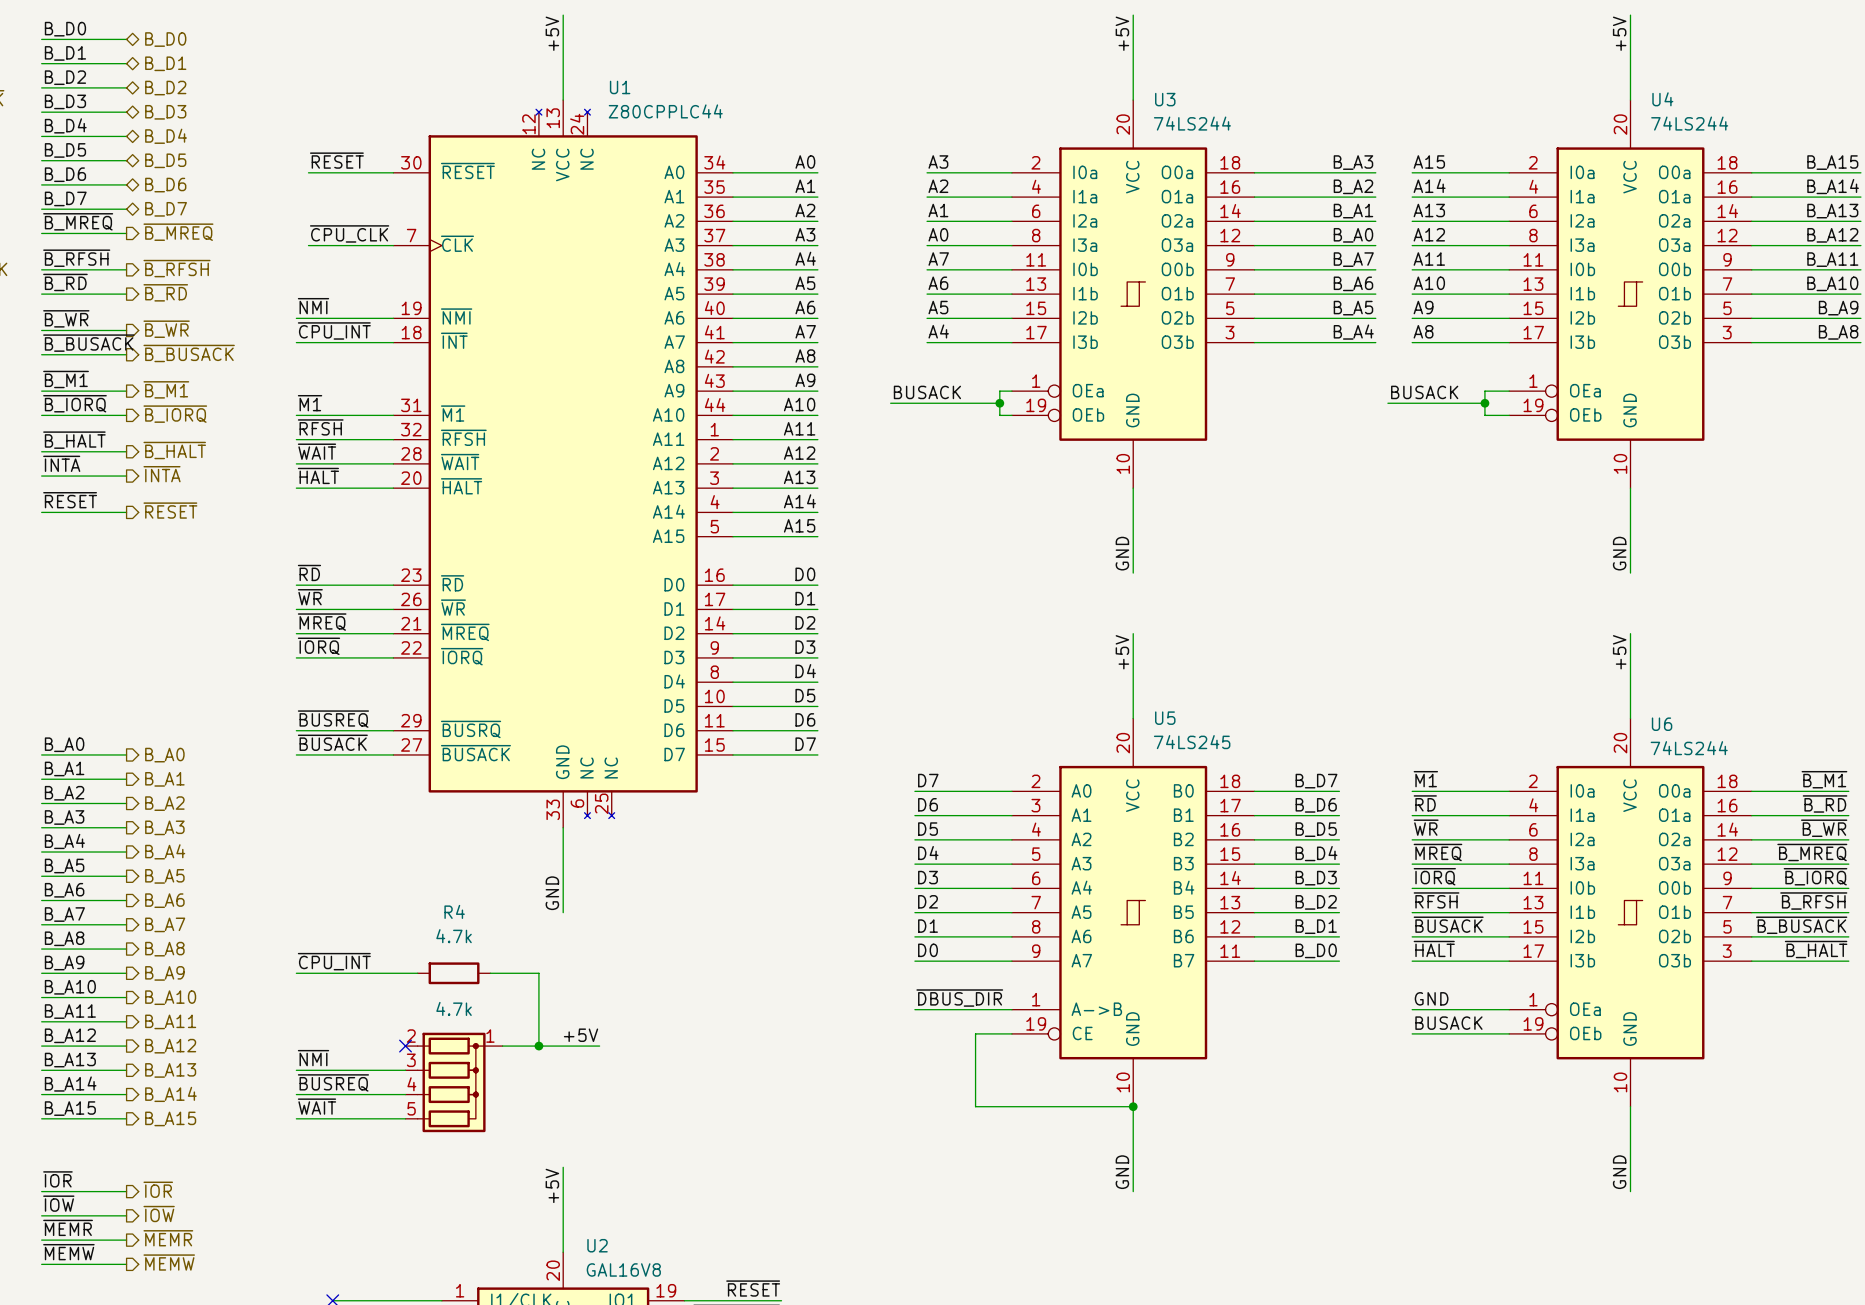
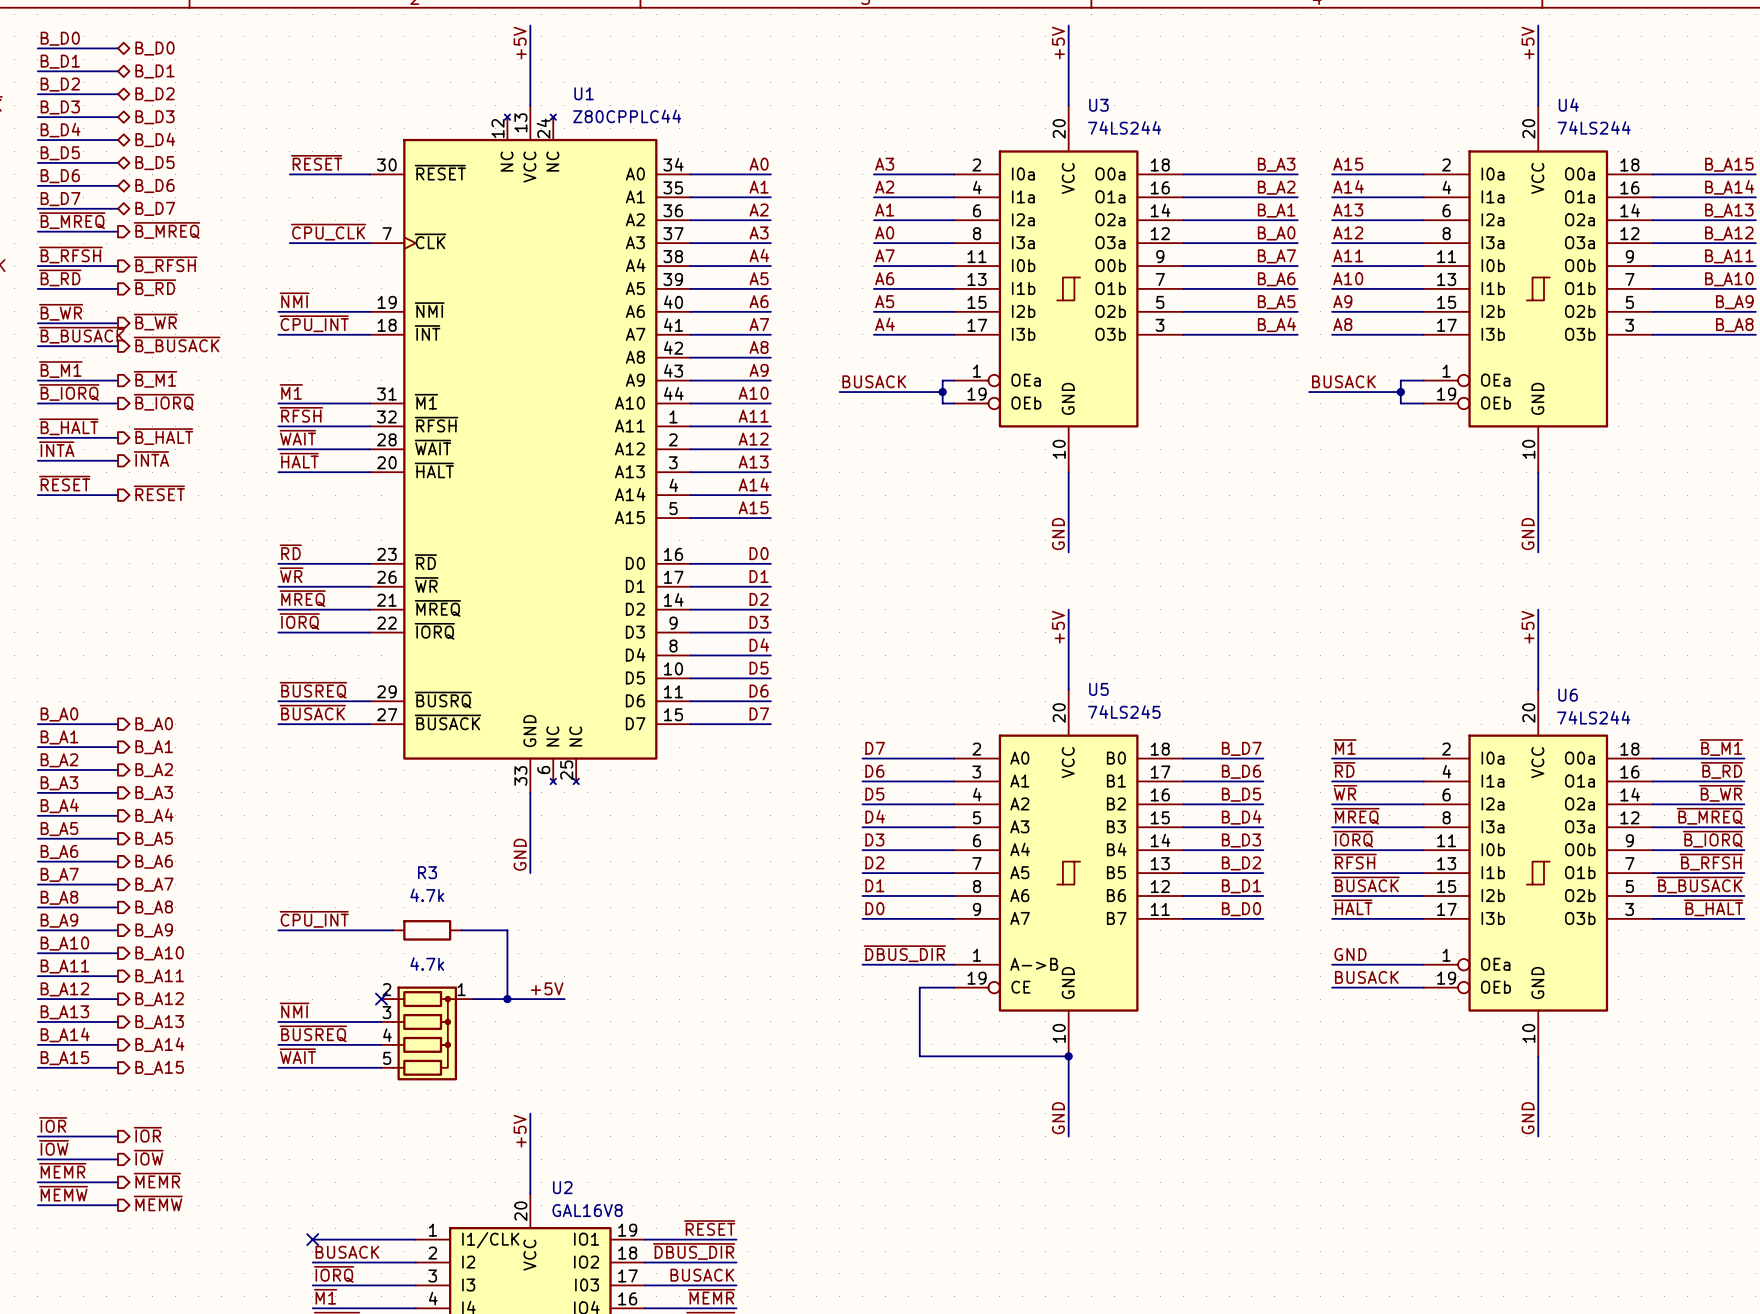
R4 name: R4 (454, 911) -> R3 (427, 872)

